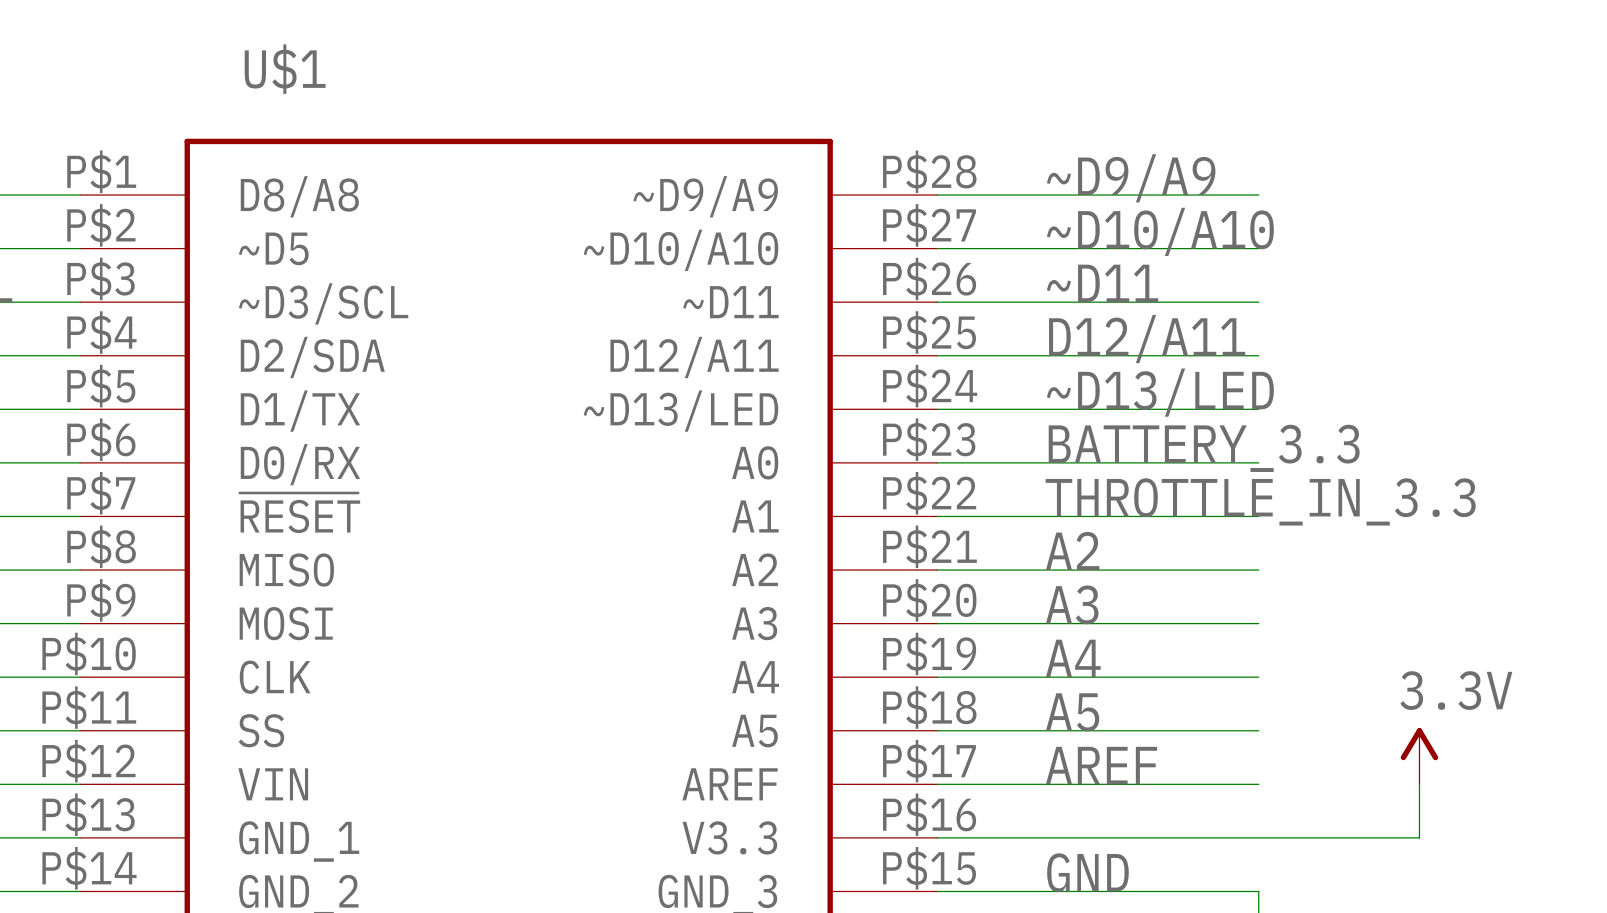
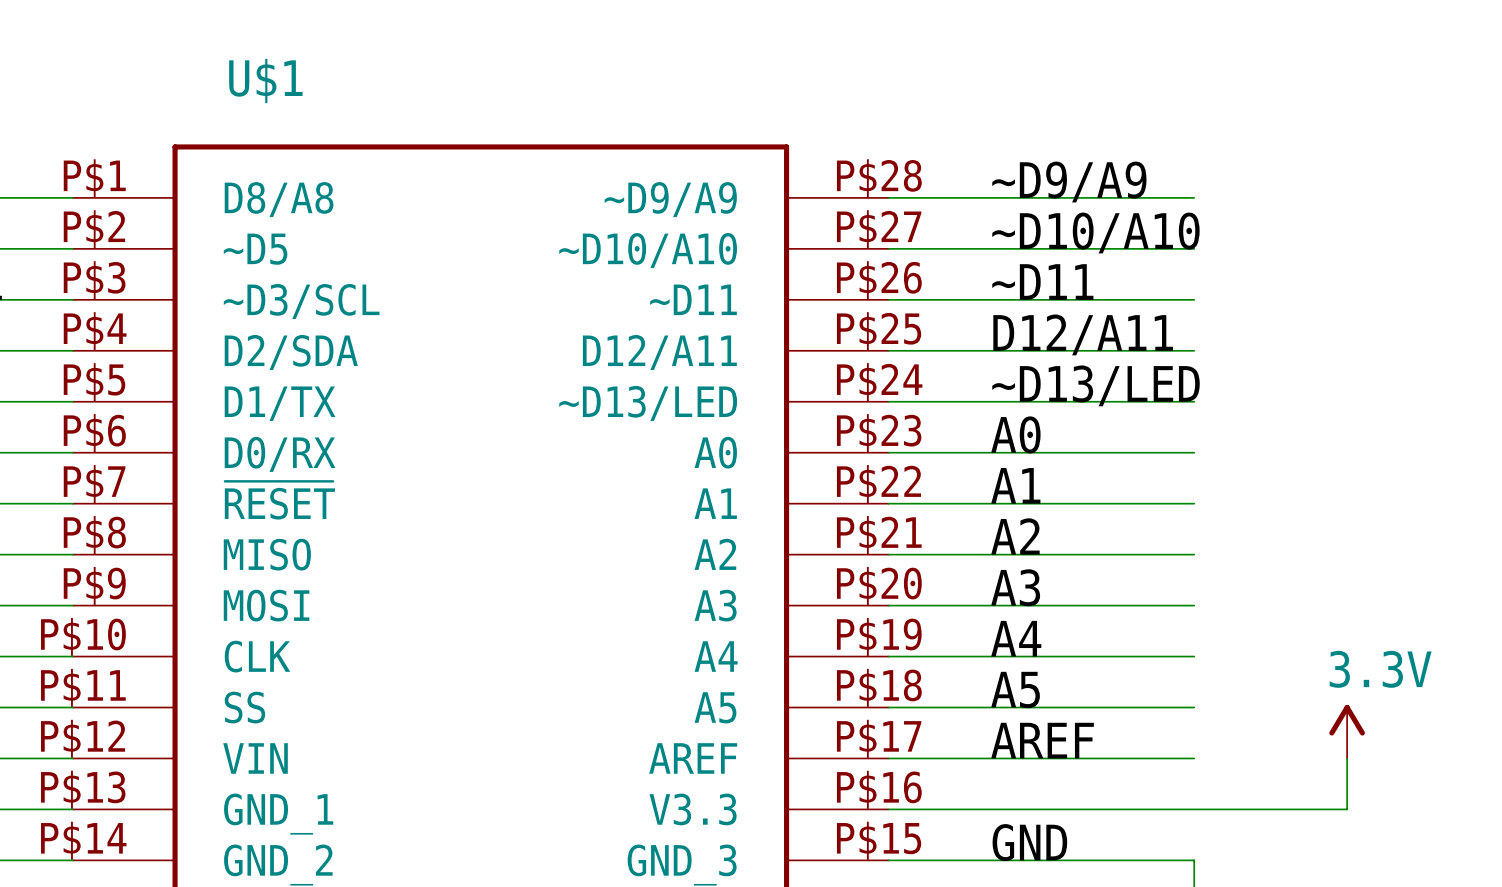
label: BATTERY_3.3 (1204, 448) -> A0 (1015, 434)
label: THROTTLE_IN_3.3 (1260, 501) -> A1 (1015, 485)

